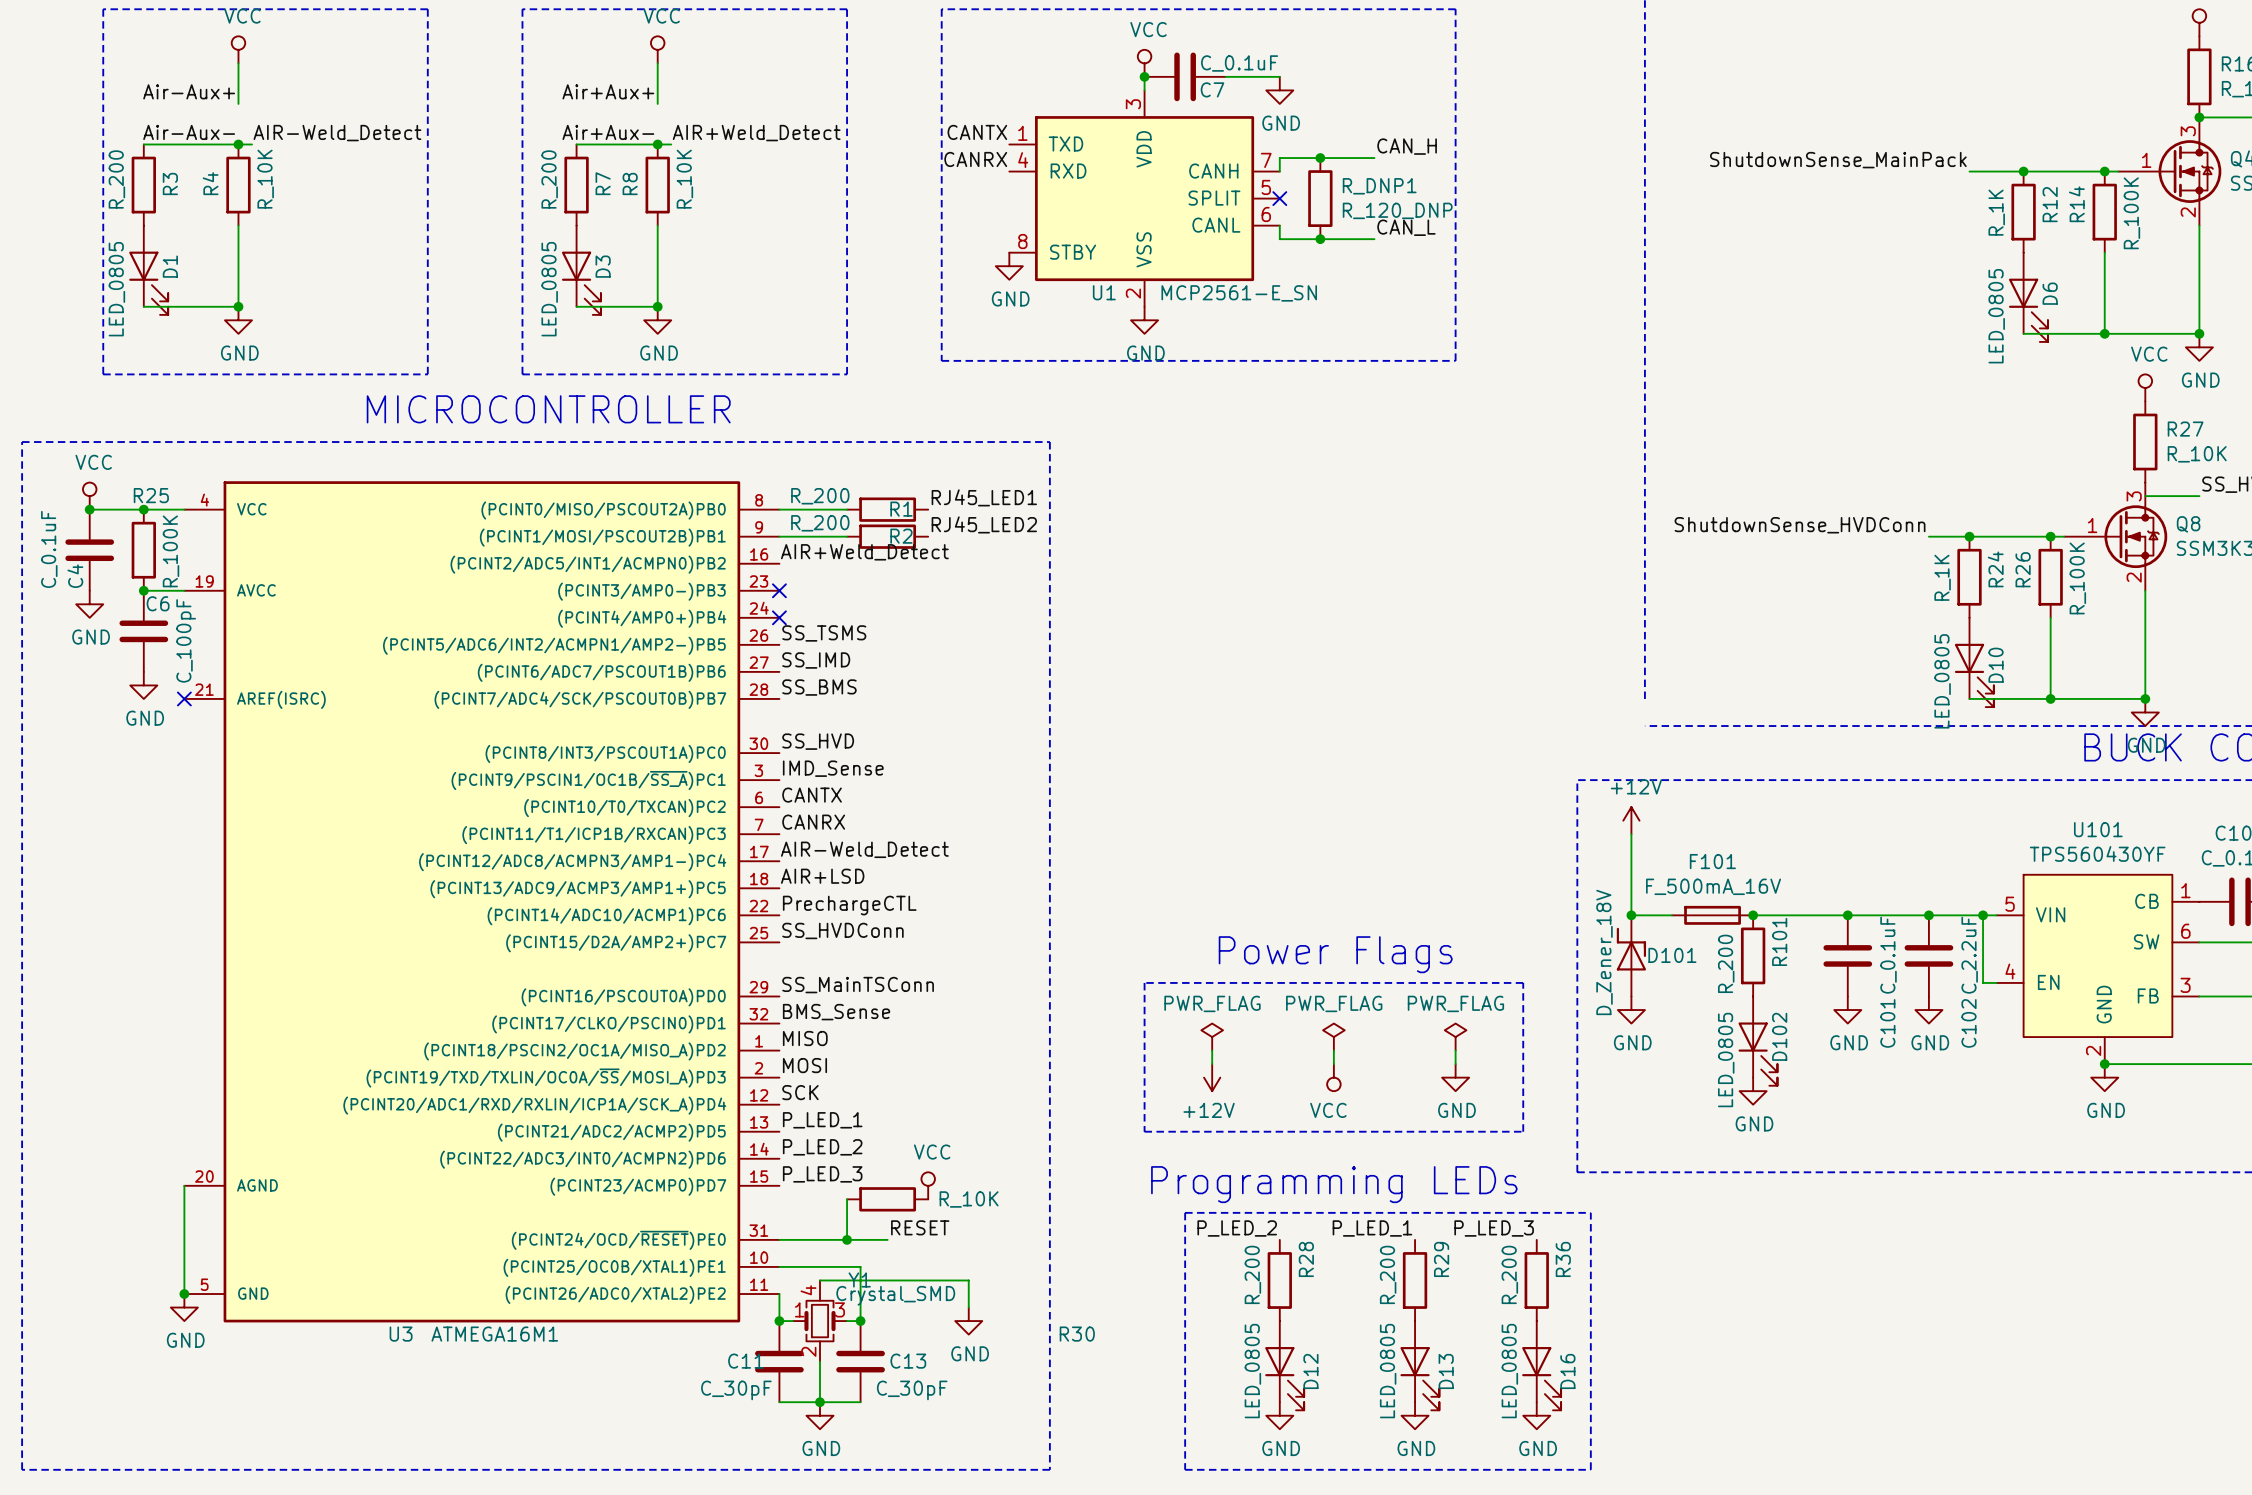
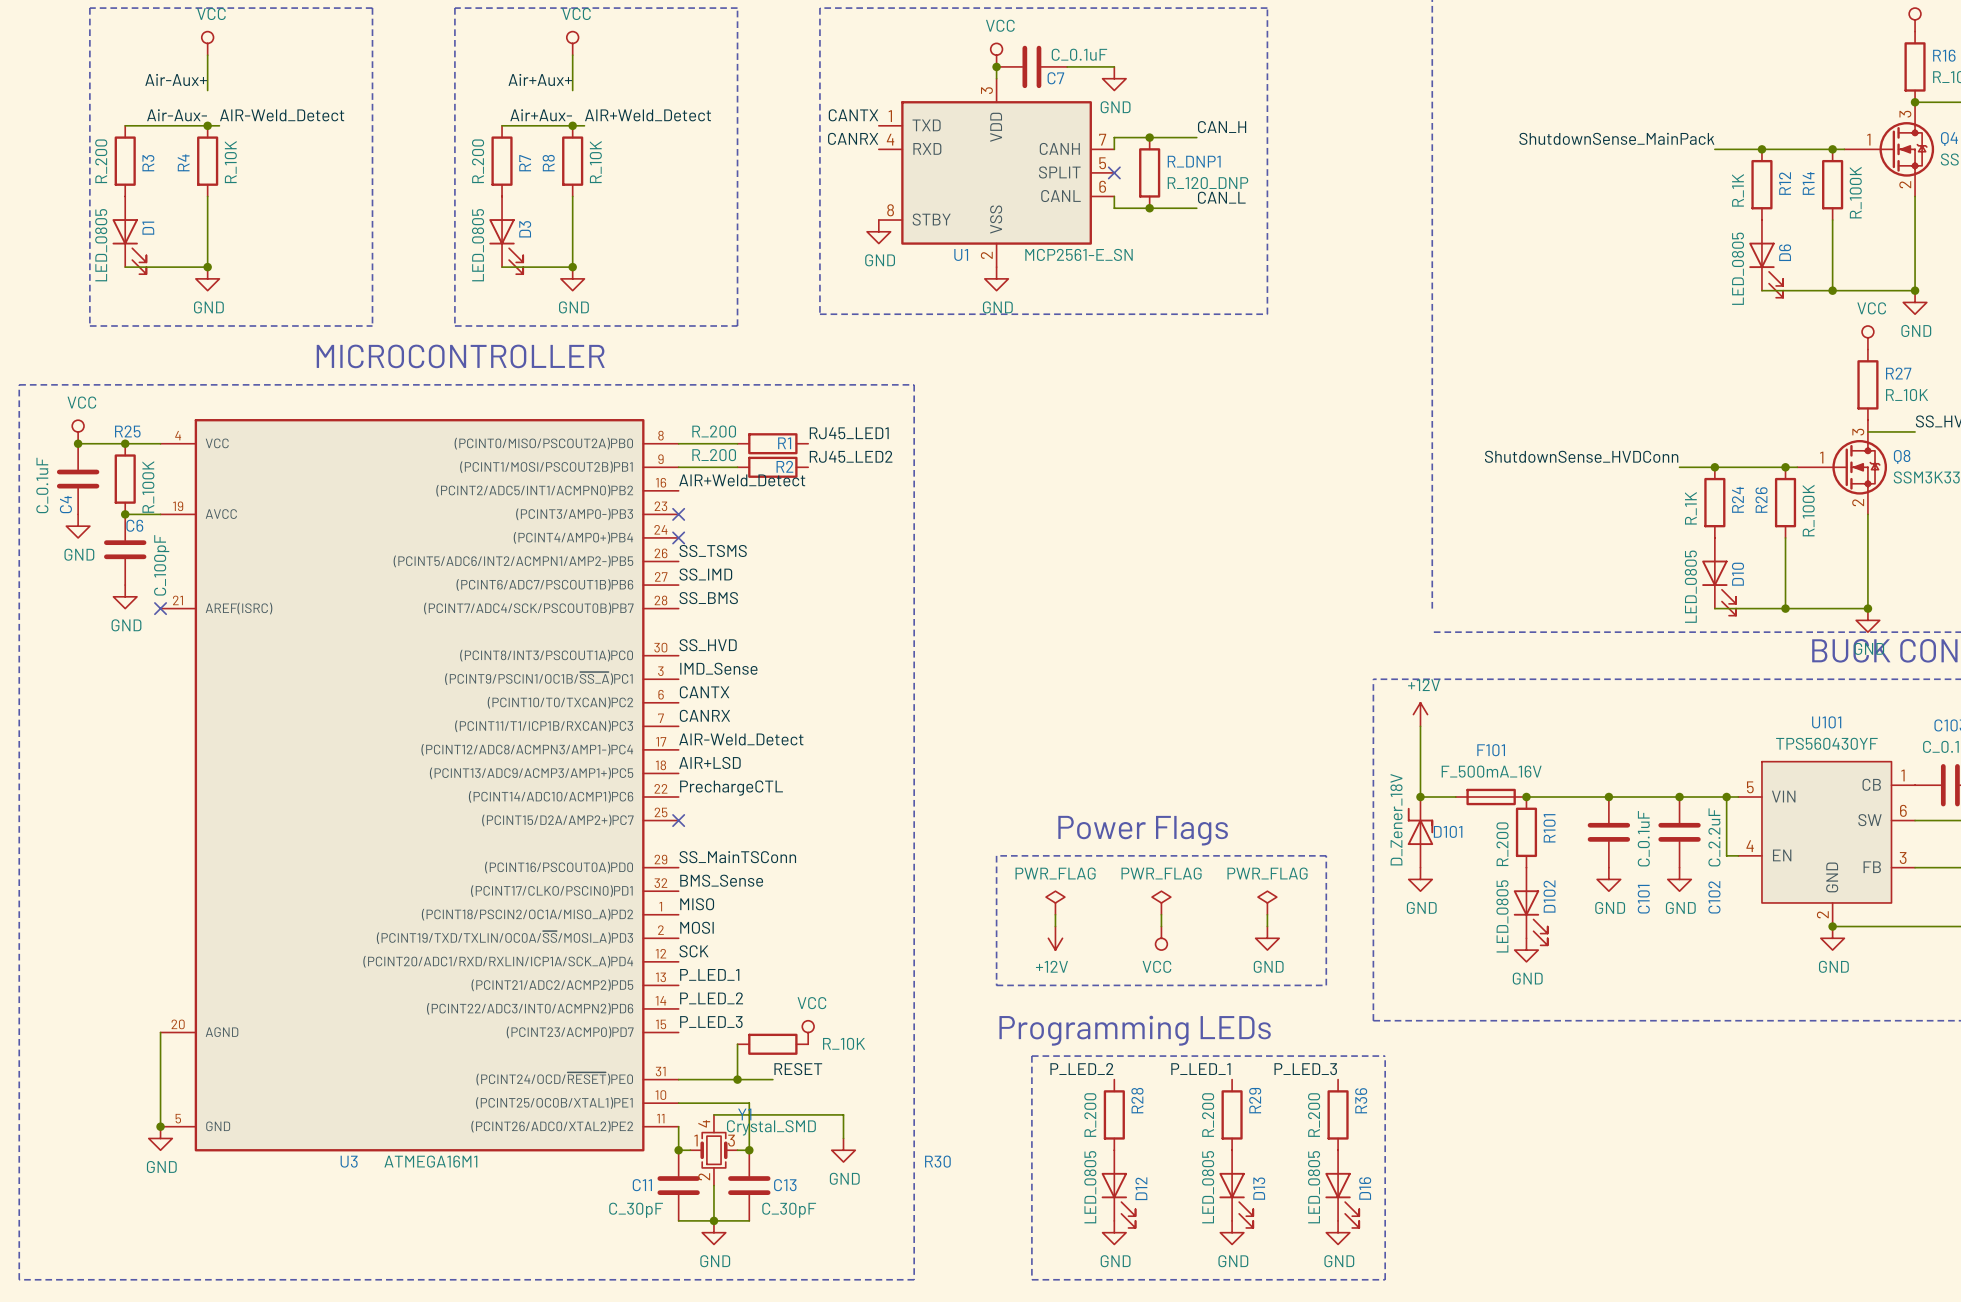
label: SS_HVDConn (842, 930) -> none
no-connect mark: none -> (678, 820)

